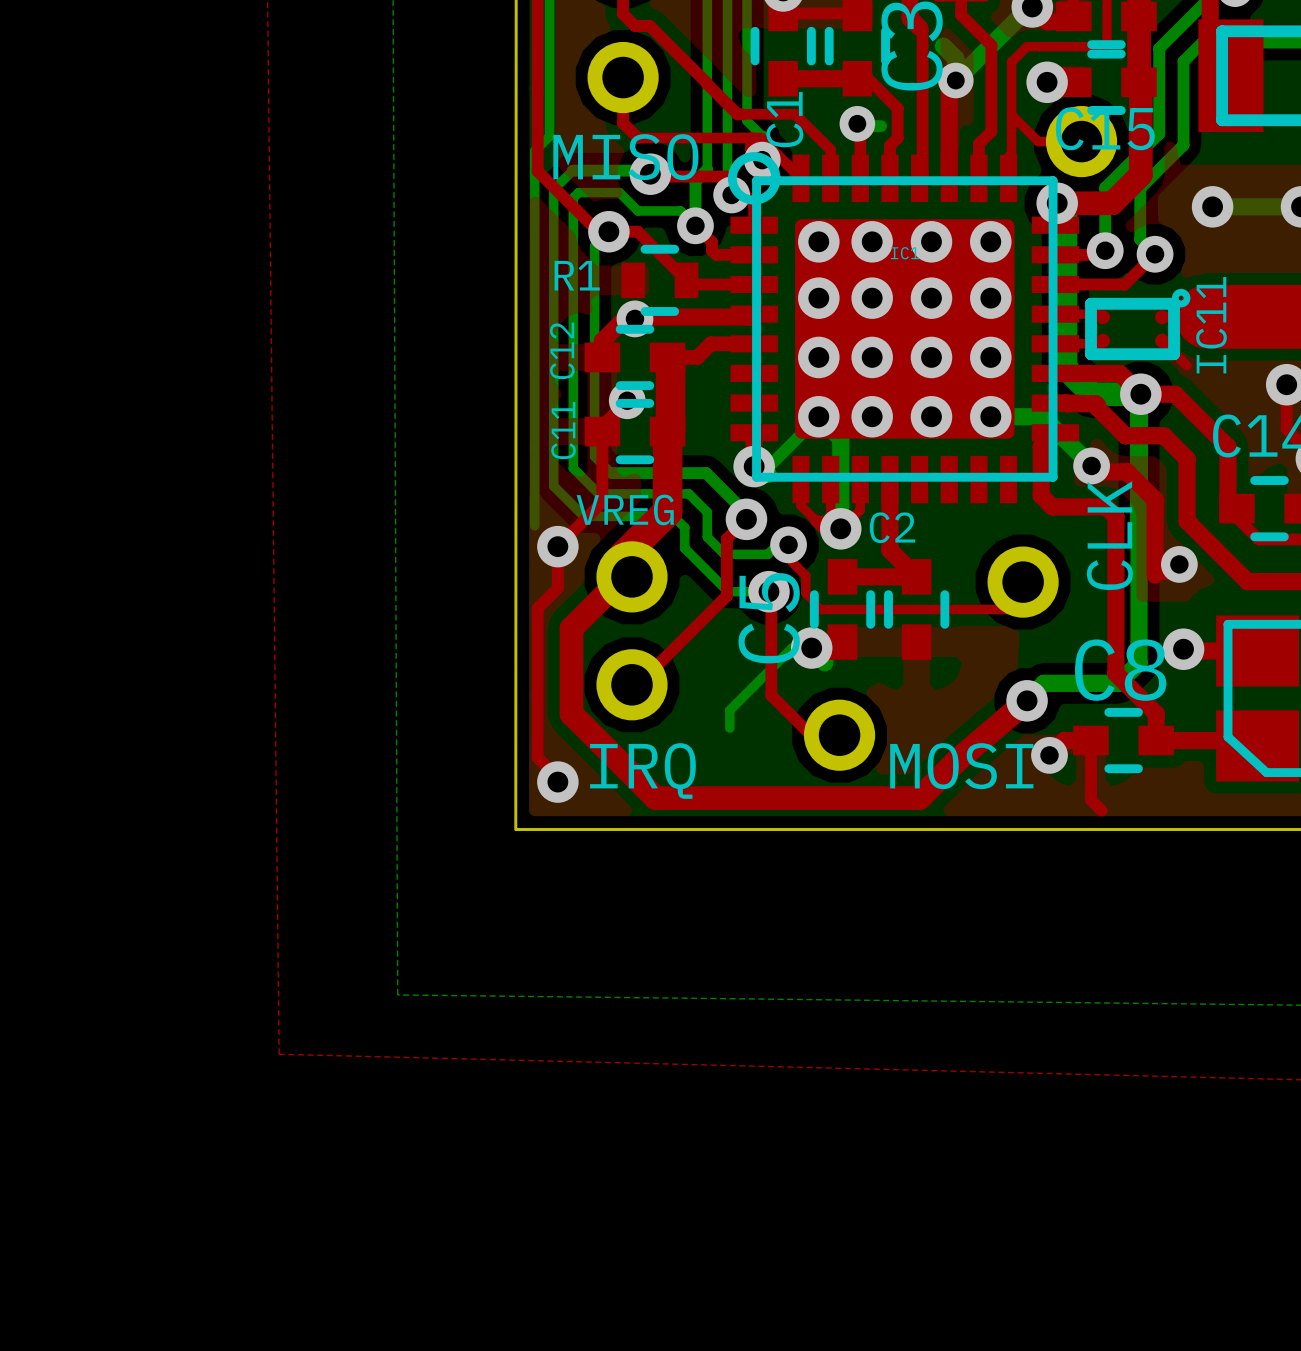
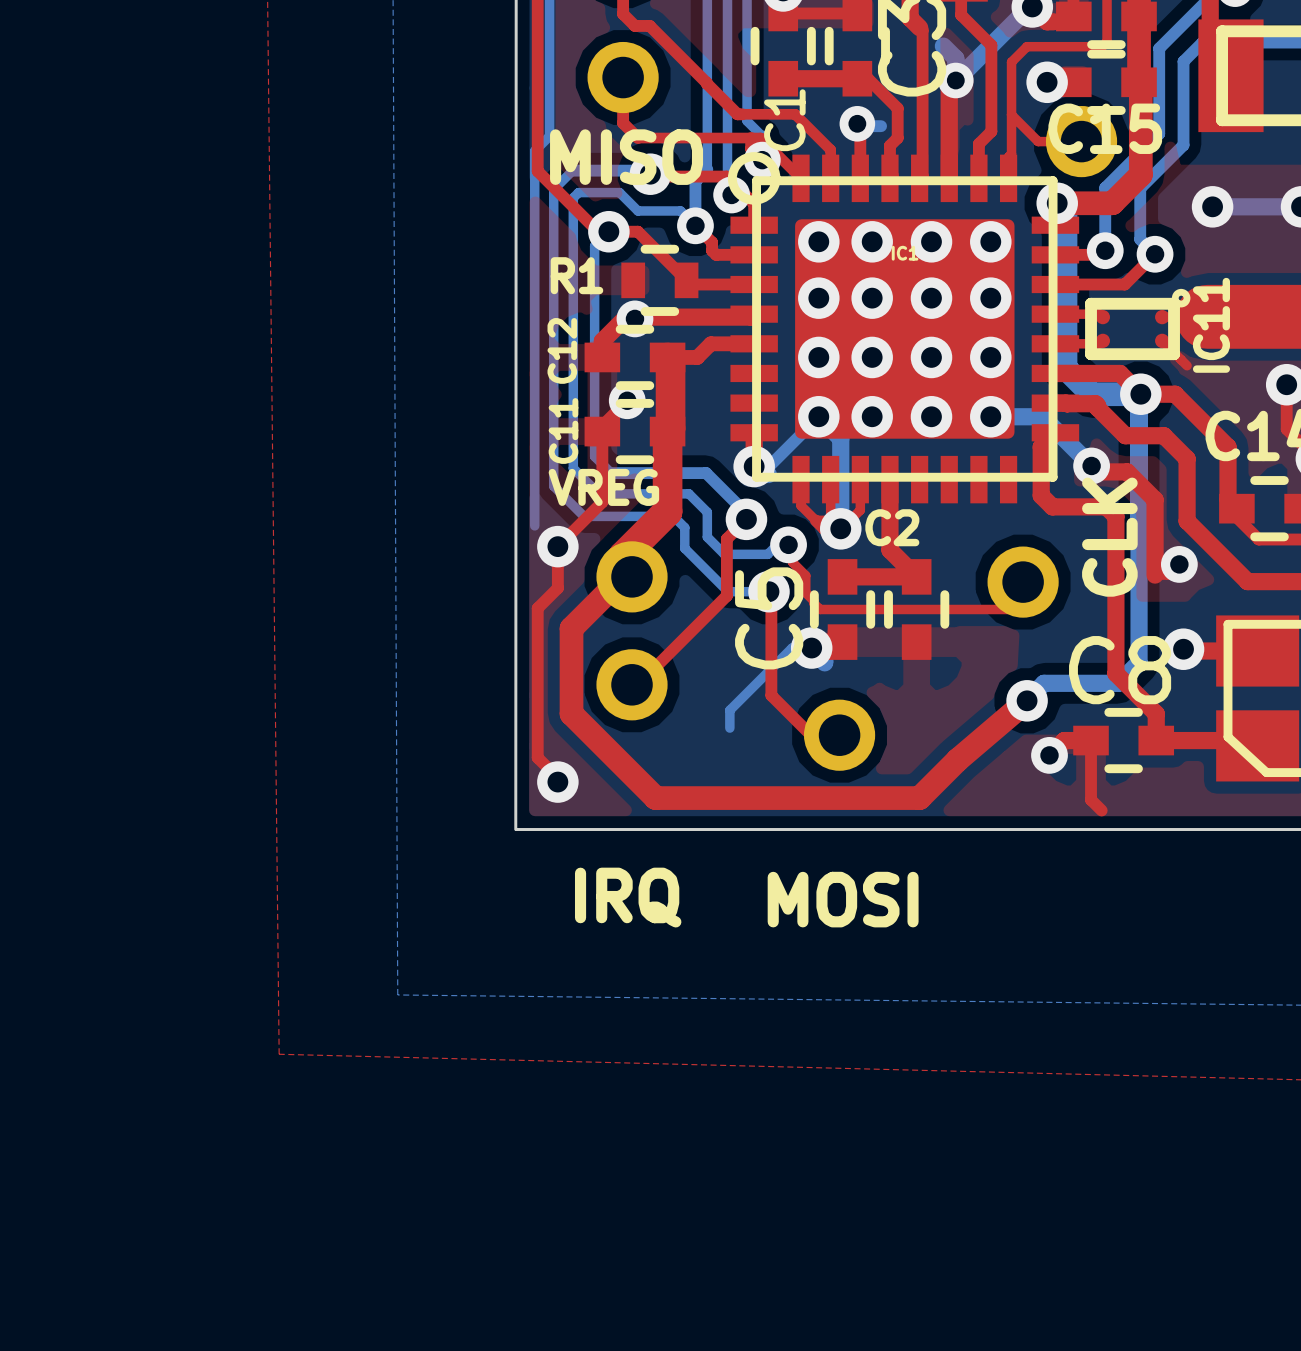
text position: VREG (625, 509) -> VREG (603, 487)
text position: MOSI (961, 766) -> MOSI (843, 899)
text position: IRQ (642, 771) -> IRQ (628, 897)

